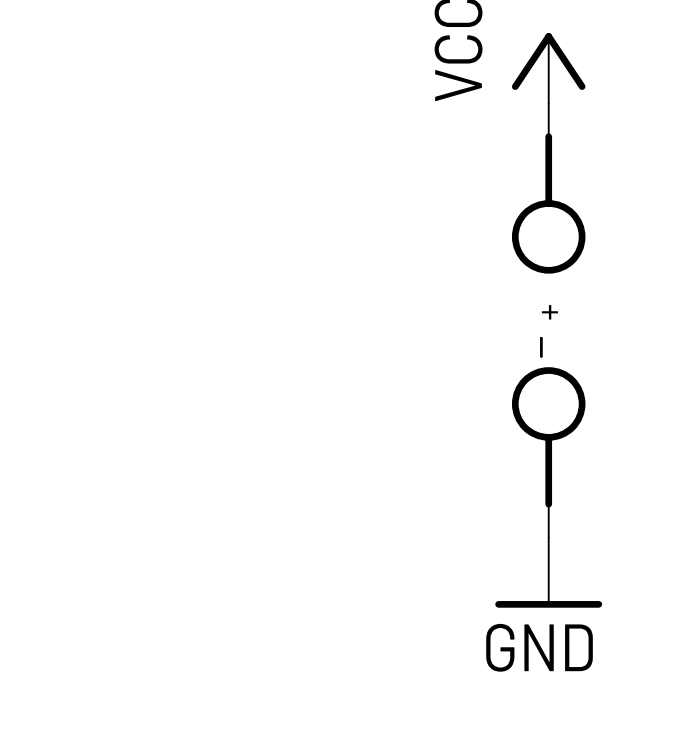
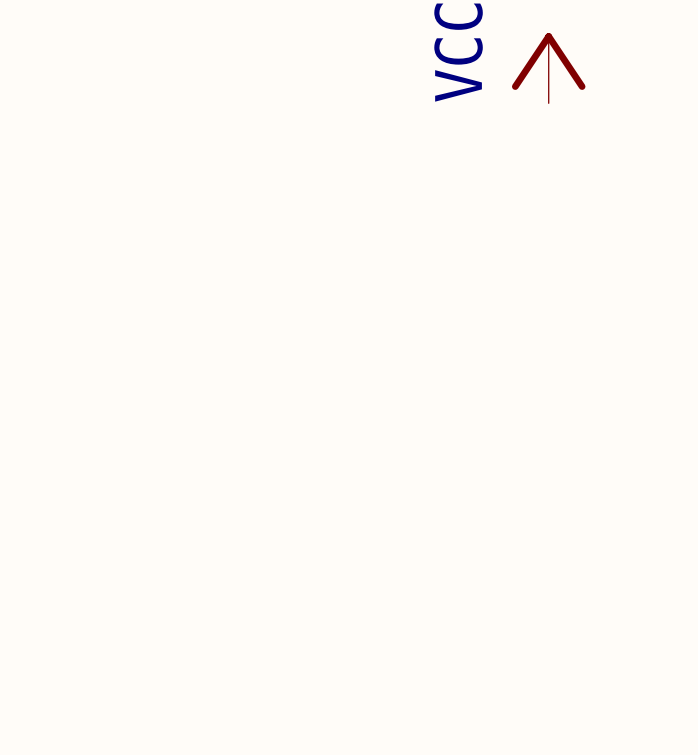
wire: (548, 103) (548, 136) -> none
part: (548, 203) -> none
part: (548, 437) -> none
wire: (548, 504) (548, 537) -> none
power symbol: GND (548, 572) -> none

